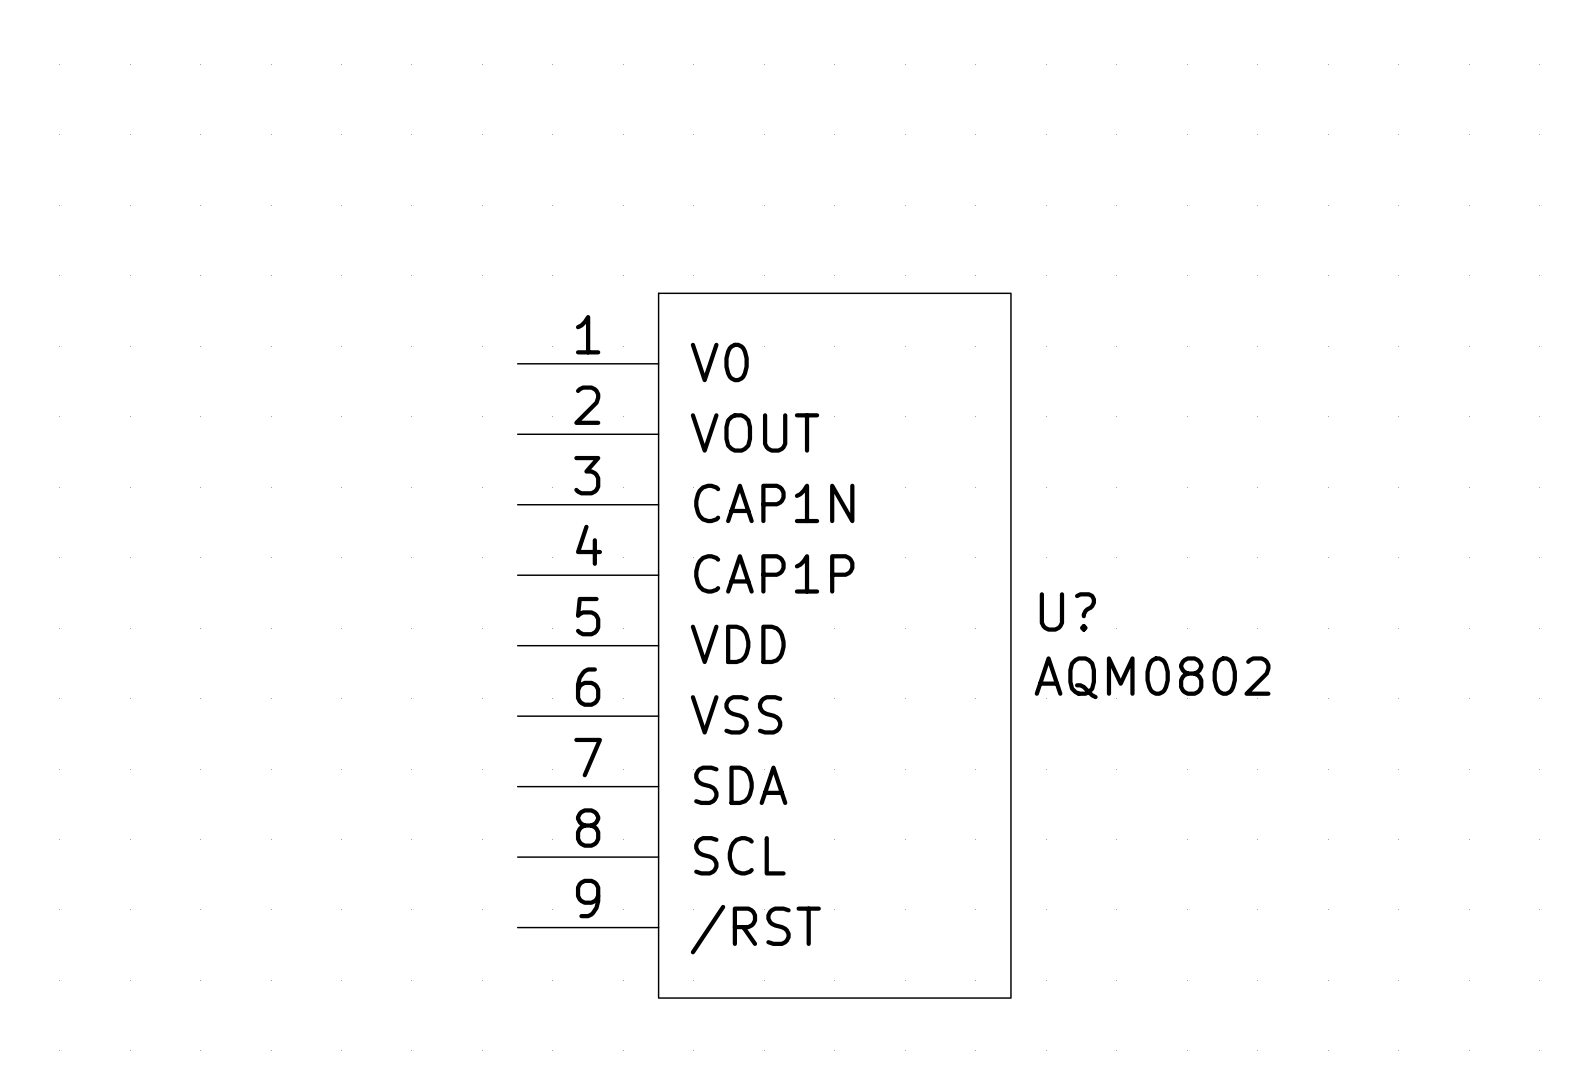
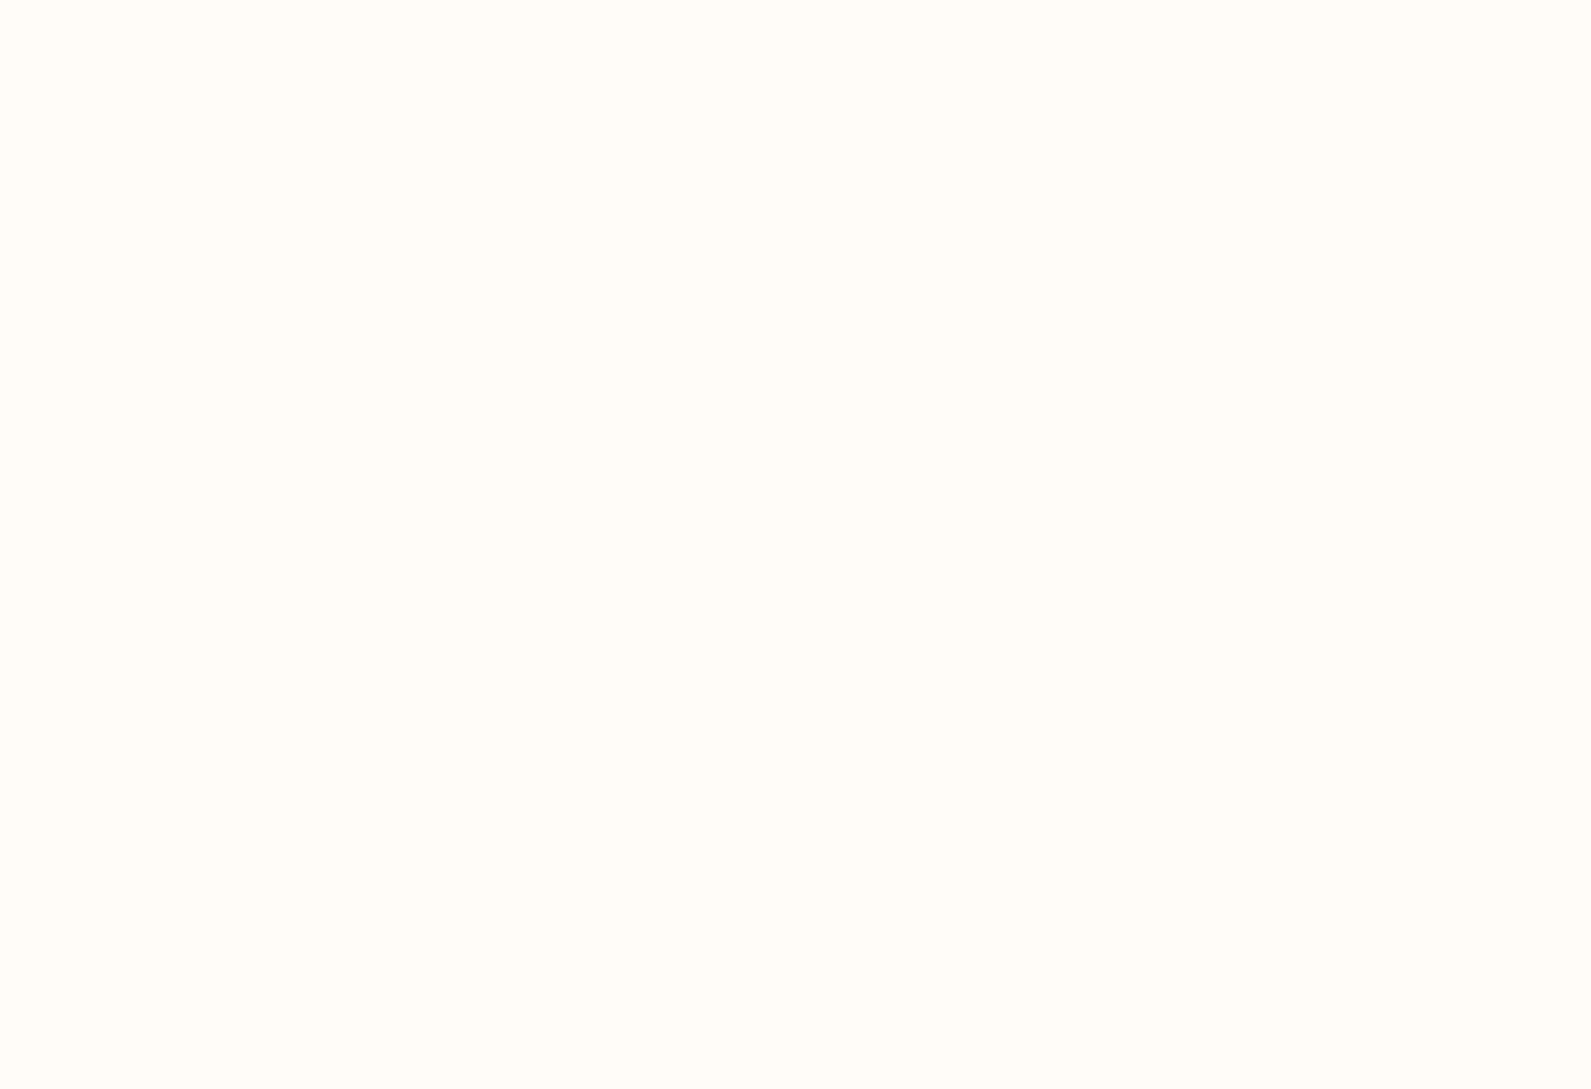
U?: AQM0802 (764, 645) -> none

